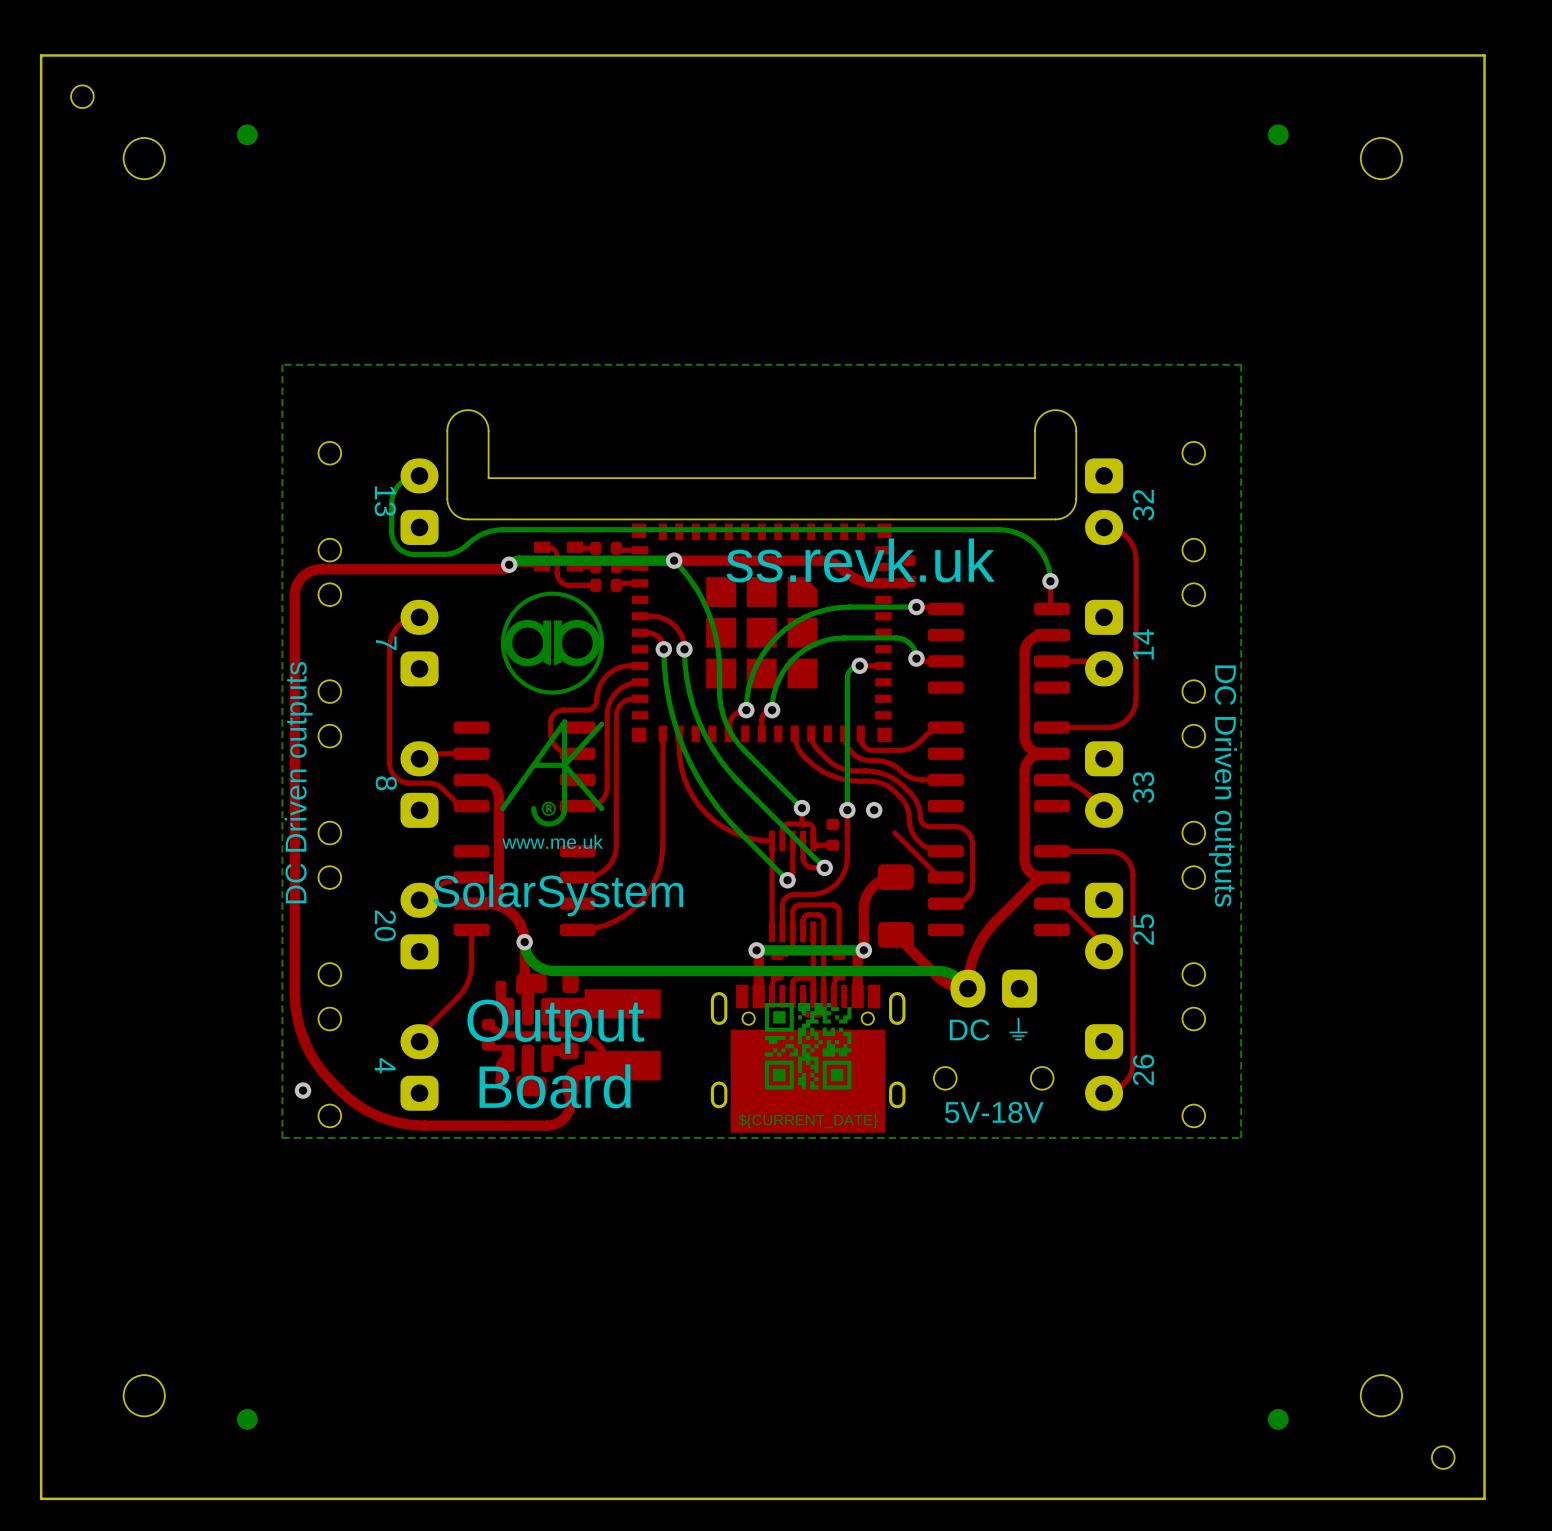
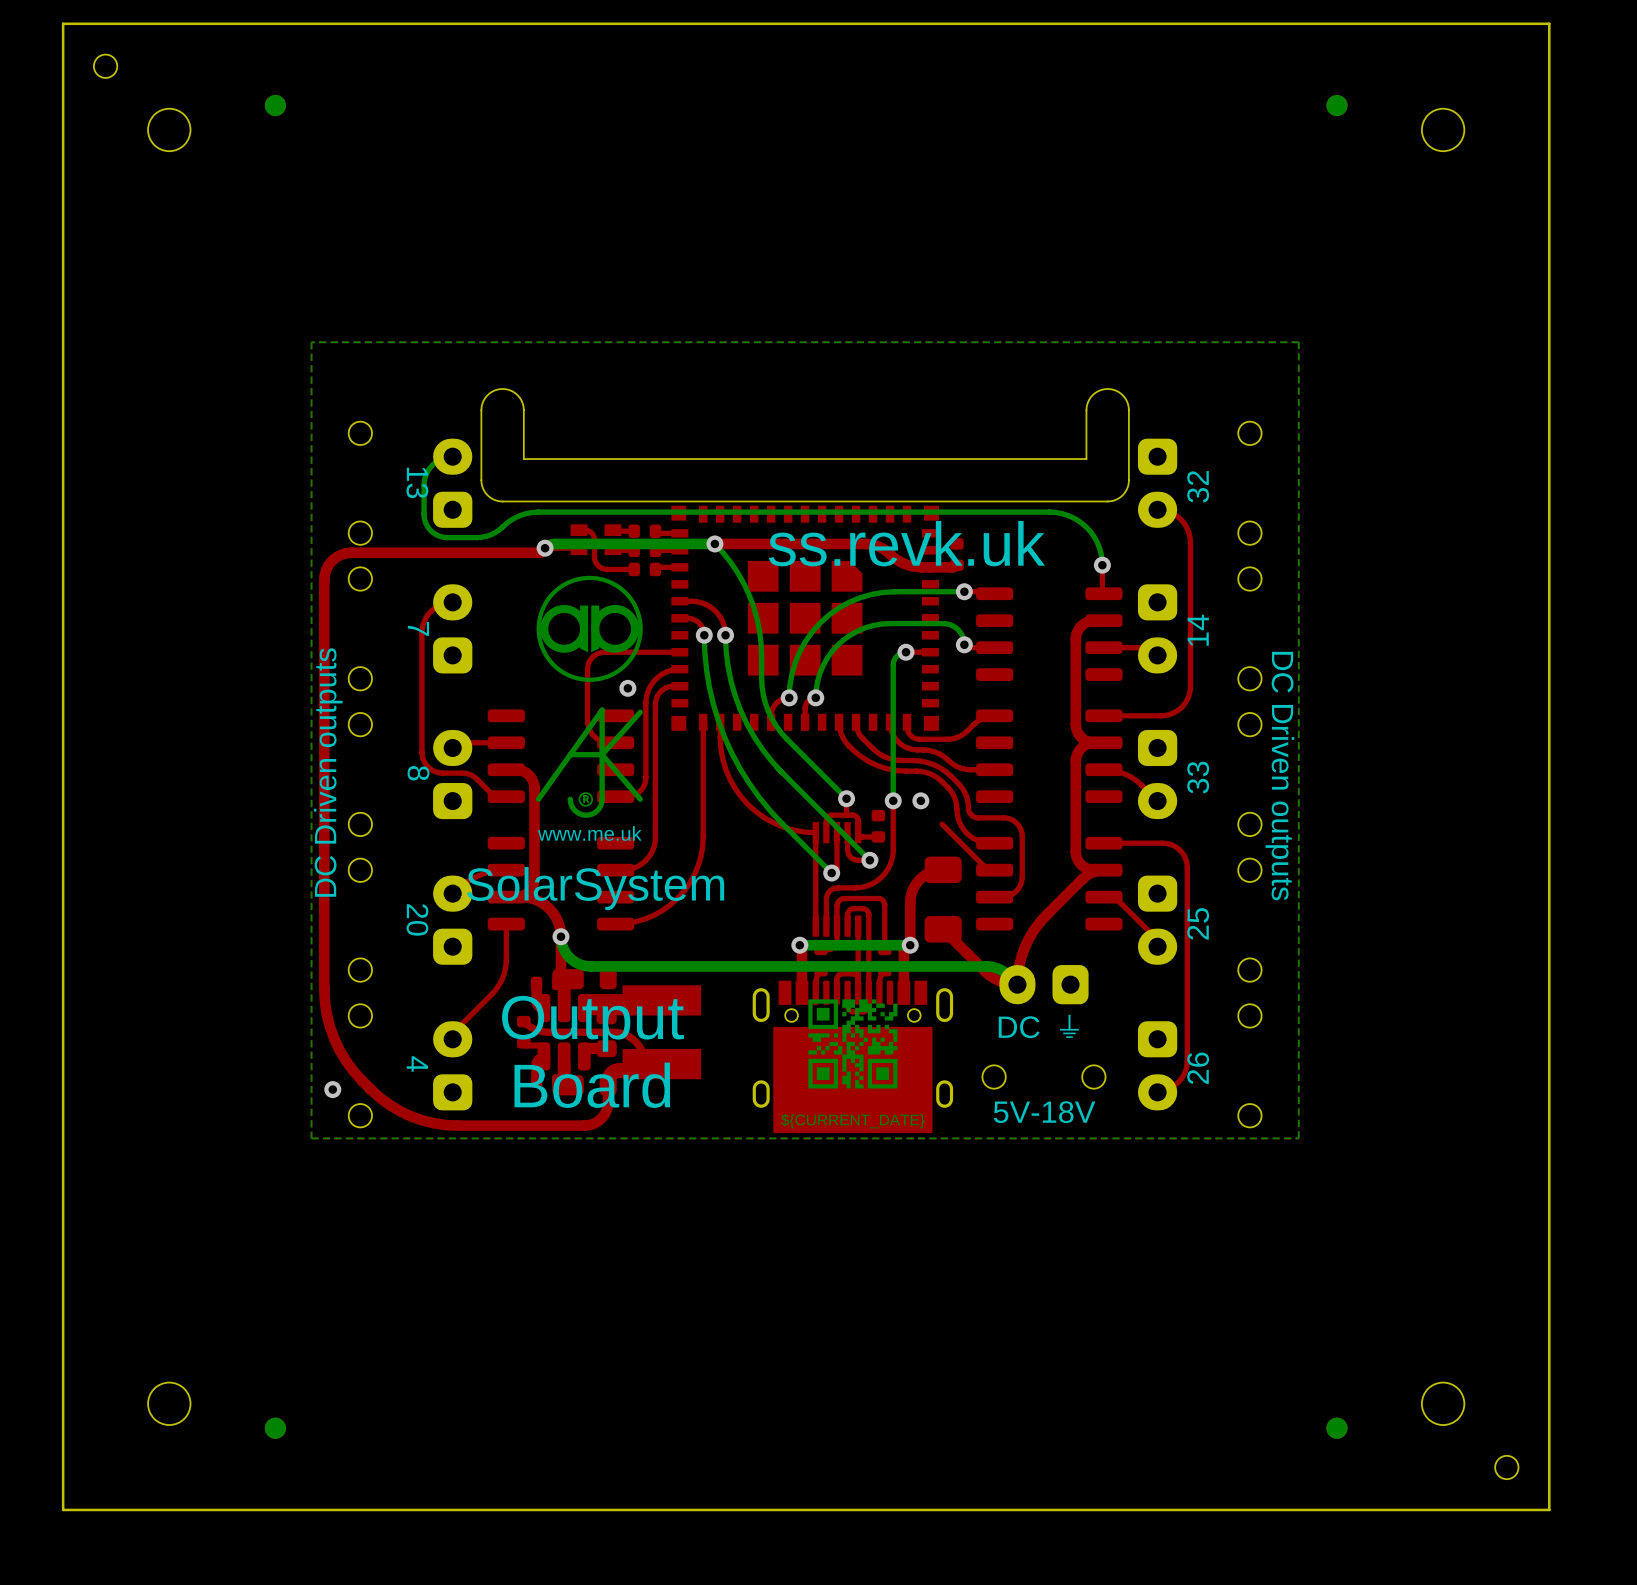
top track: (630, 665) (617, 668) (606, 675) (599, 686) (596, 702) (592, 708) (587, 710) (559, 710) (553, 714) (550, 723) -> (670, 652) (604, 652) (594, 655) (587, 667) (587, 711)
via: none -> (627, 688)

